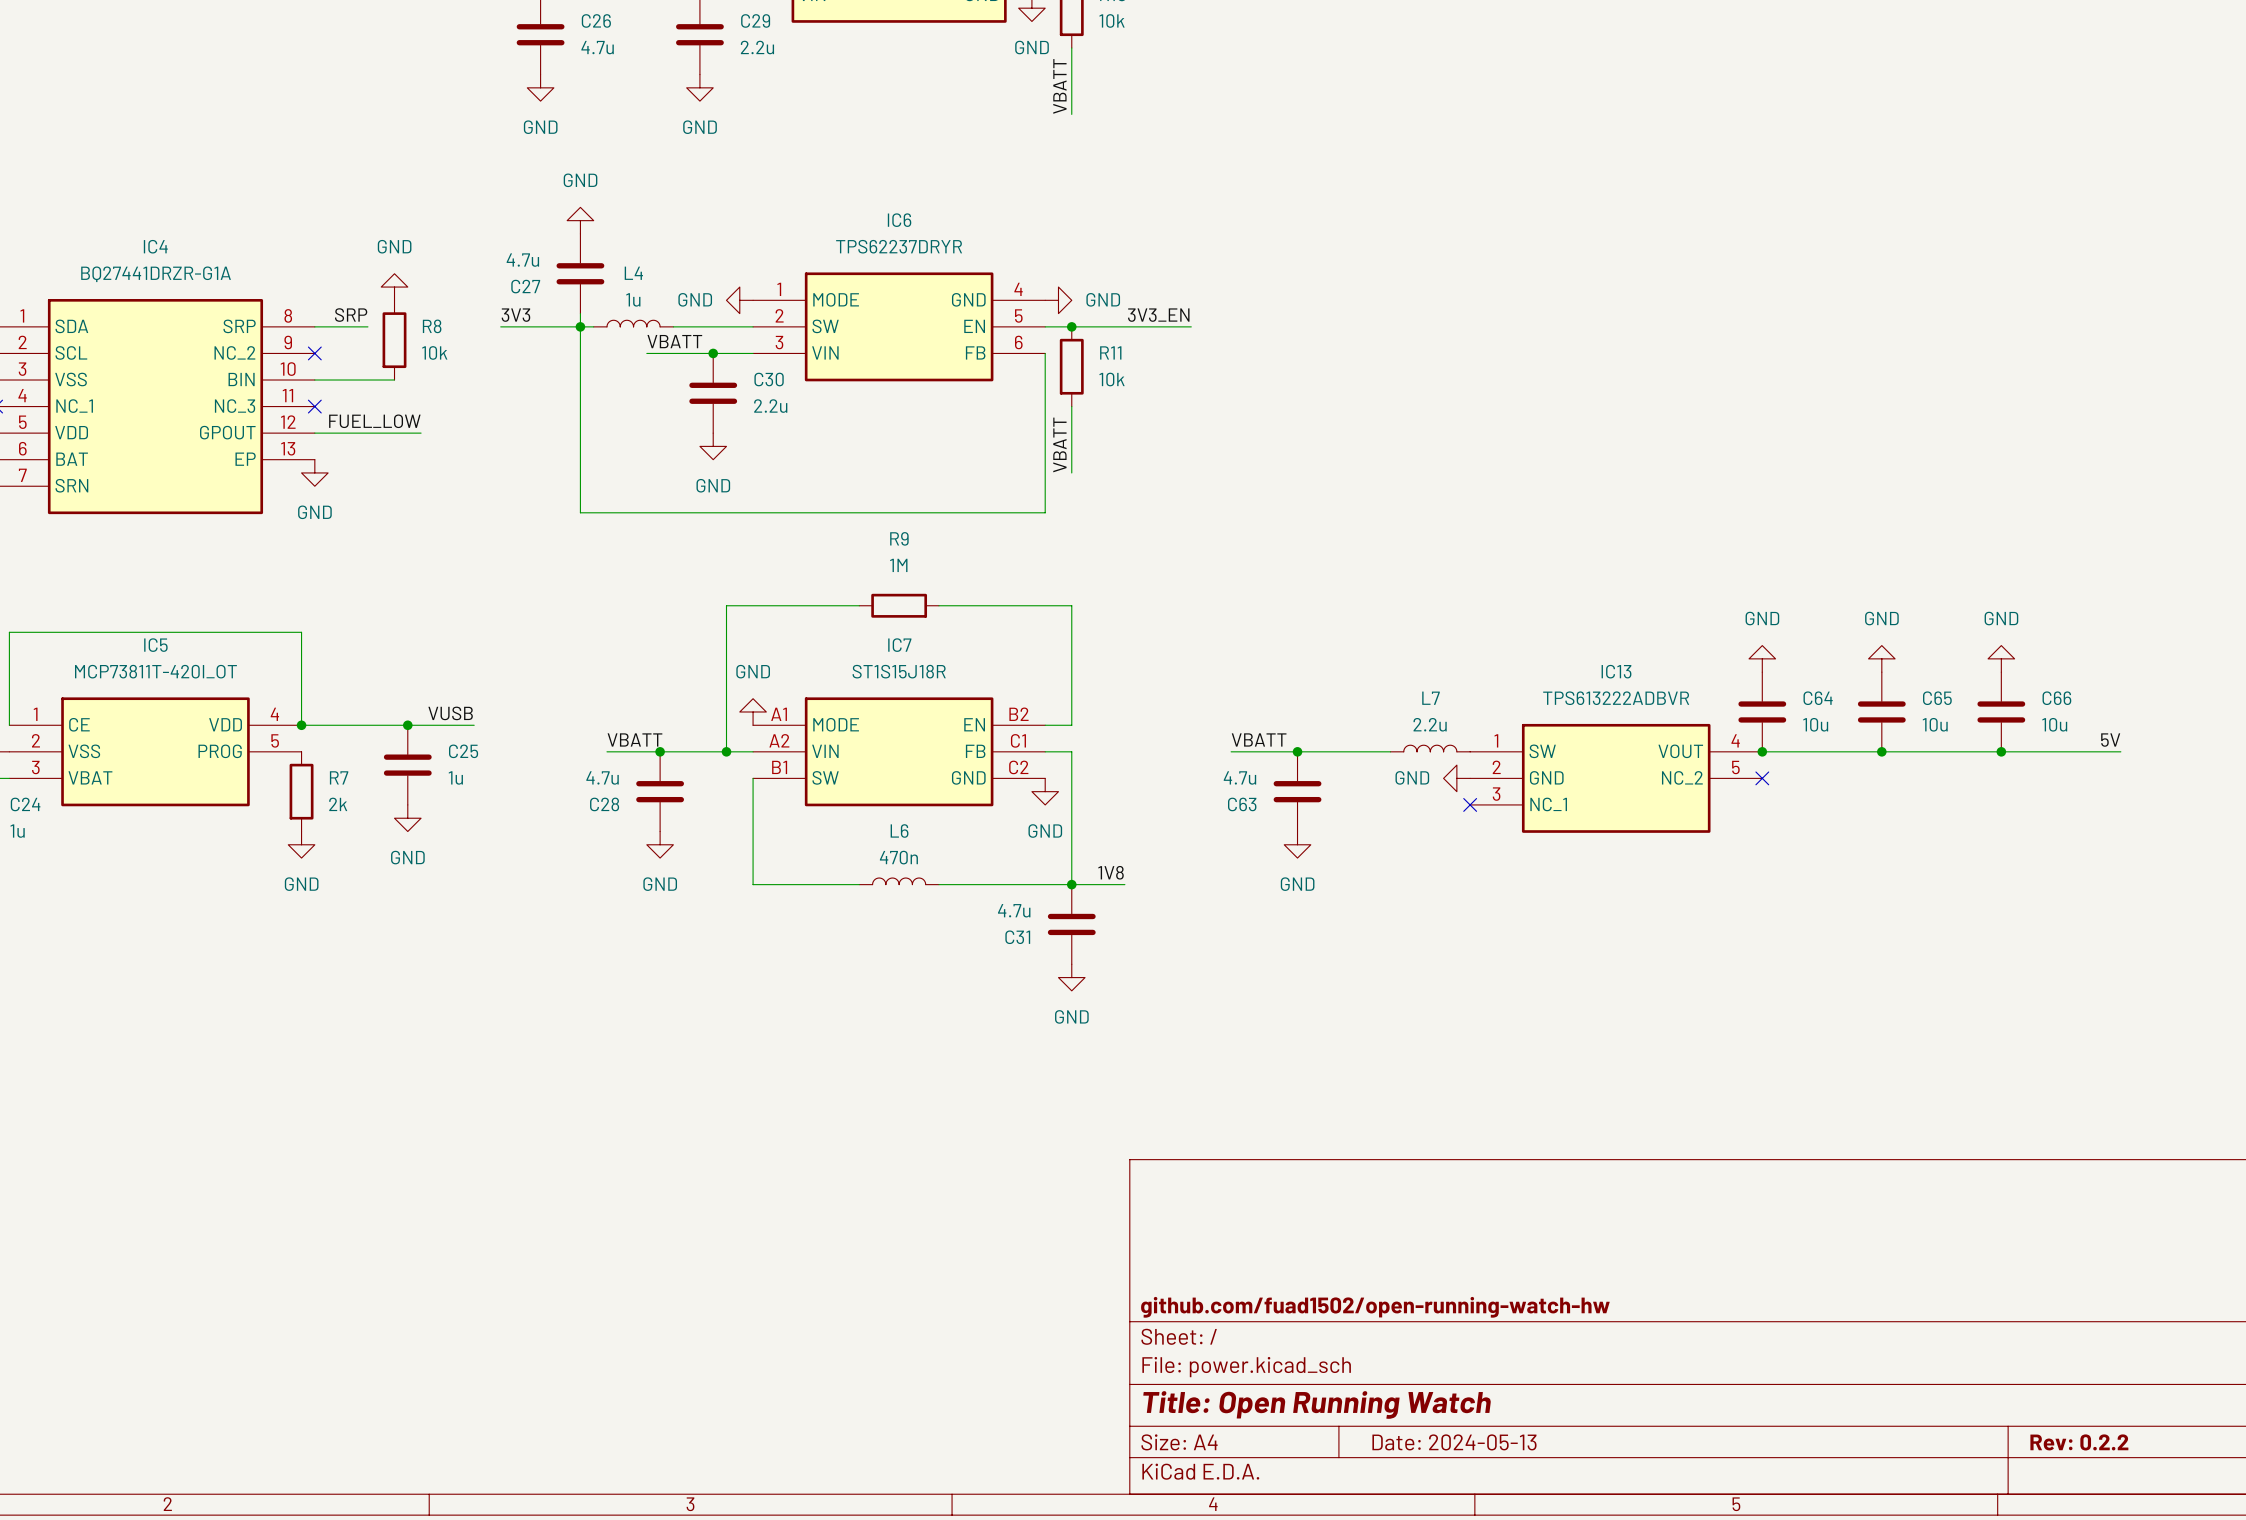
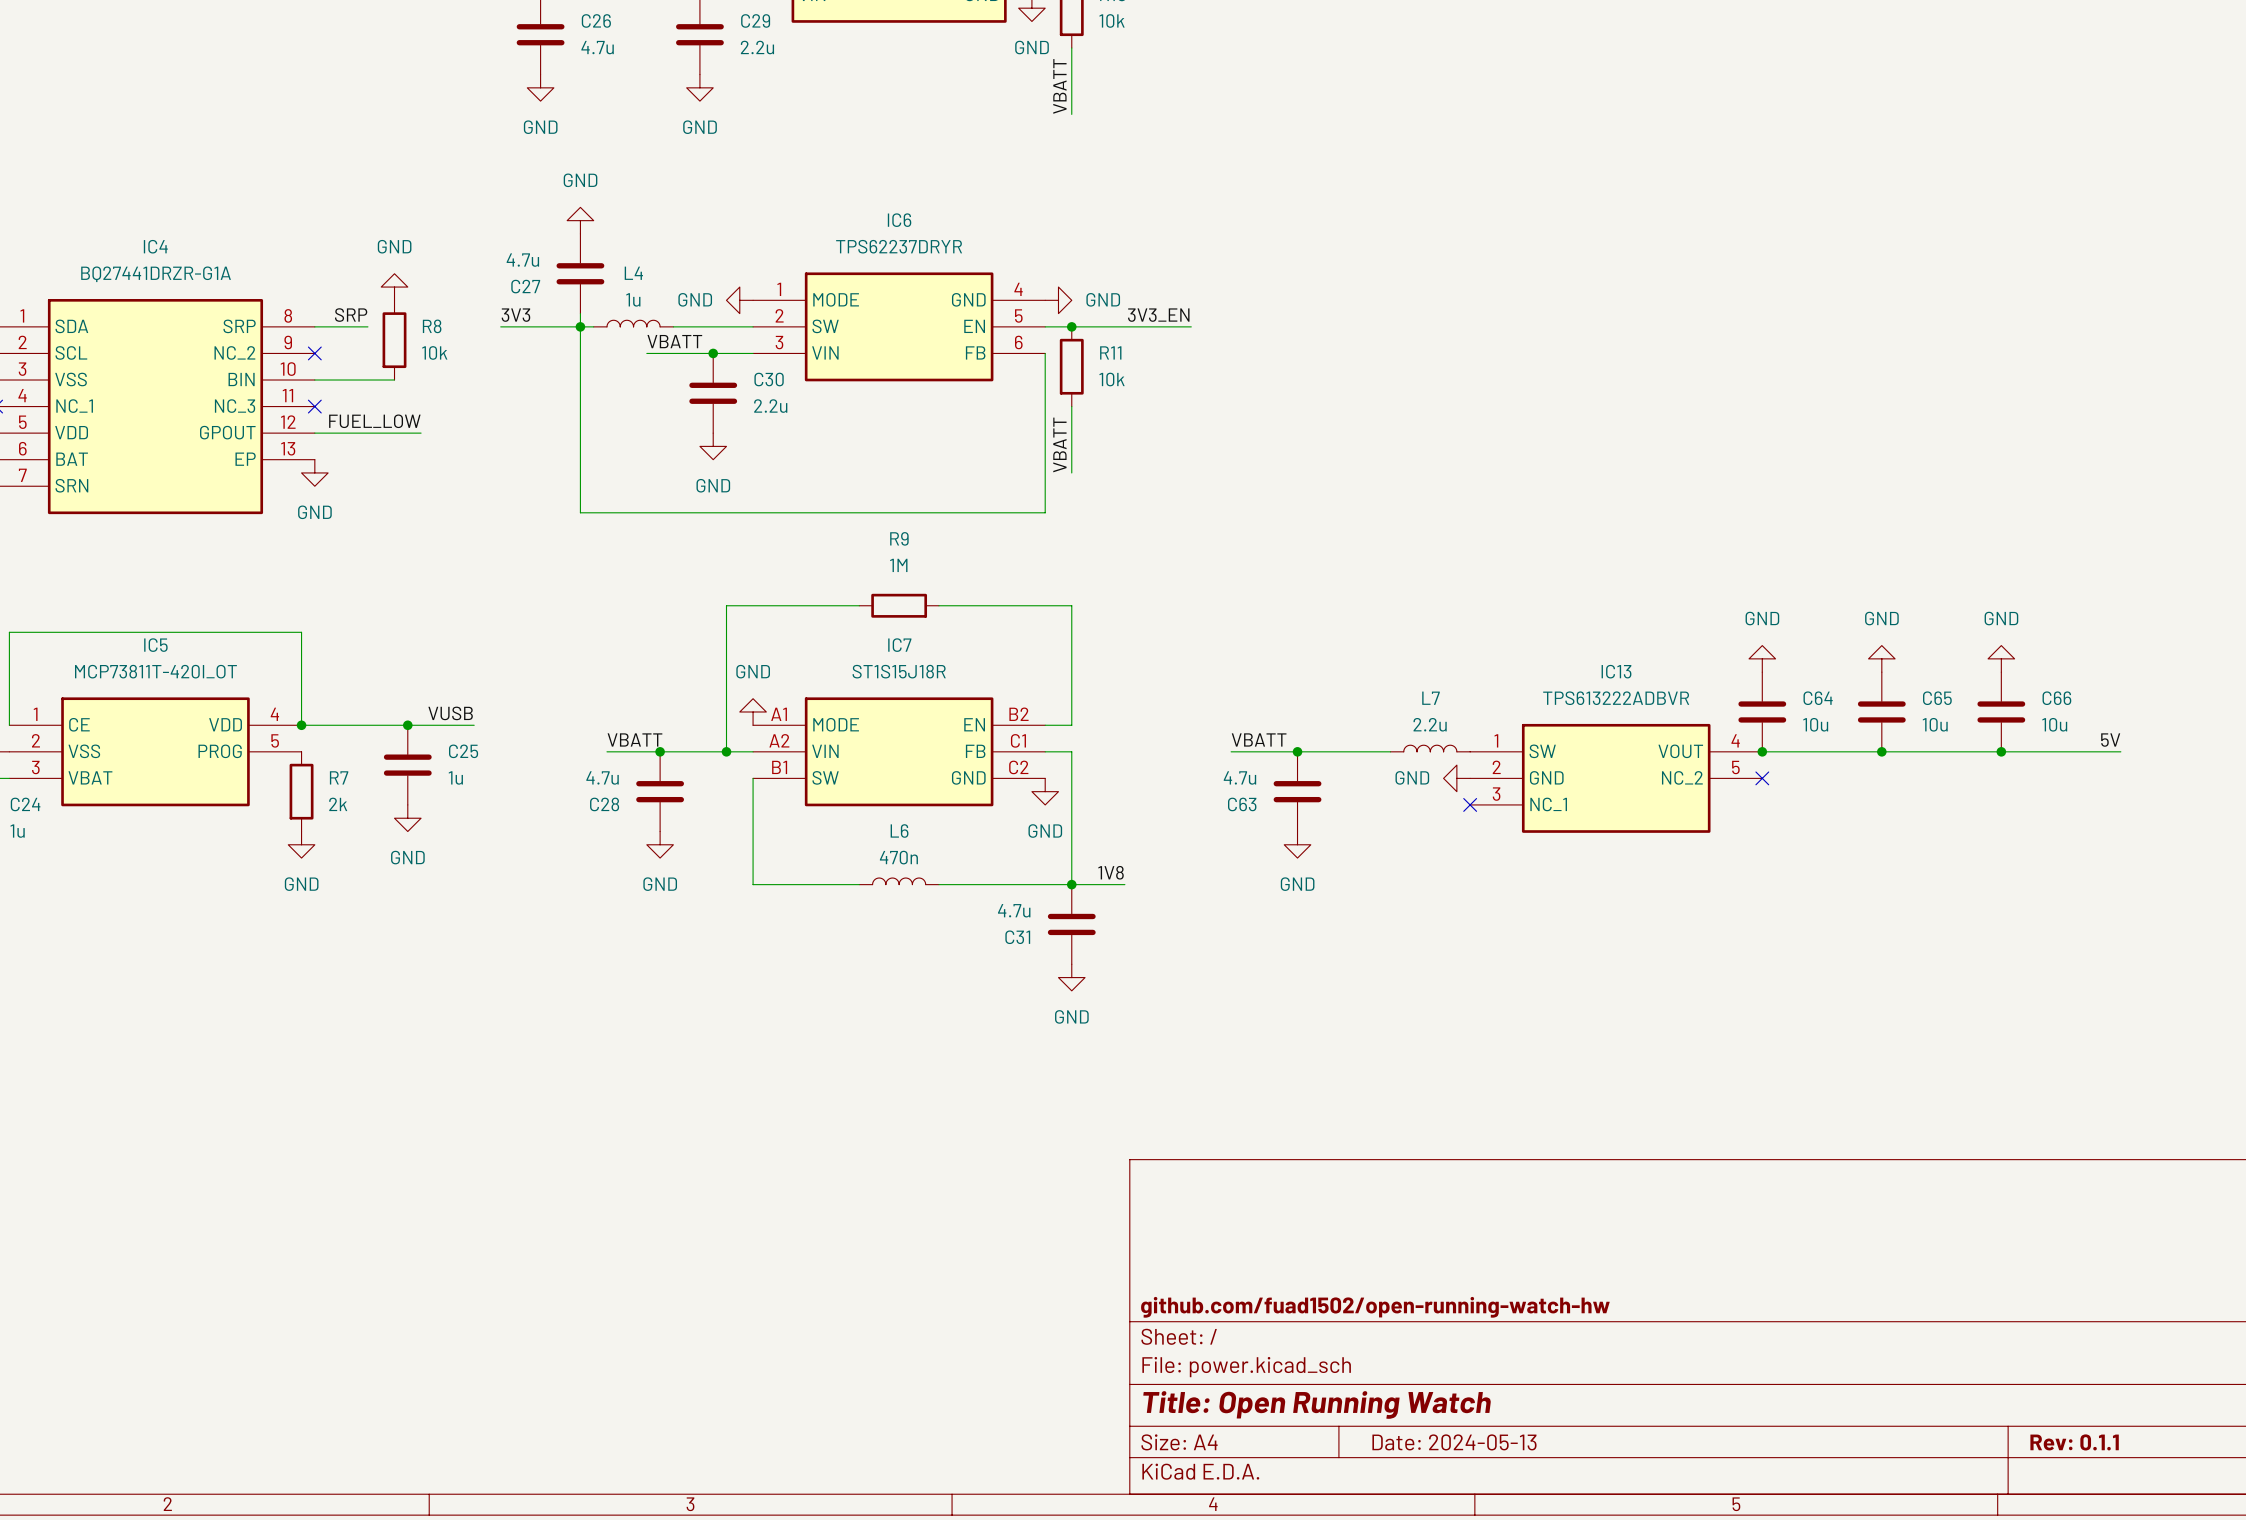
title block: Rev: 0.2.2 (2079, 1442) -> Rev: 0.1.1 (2074, 1442)

